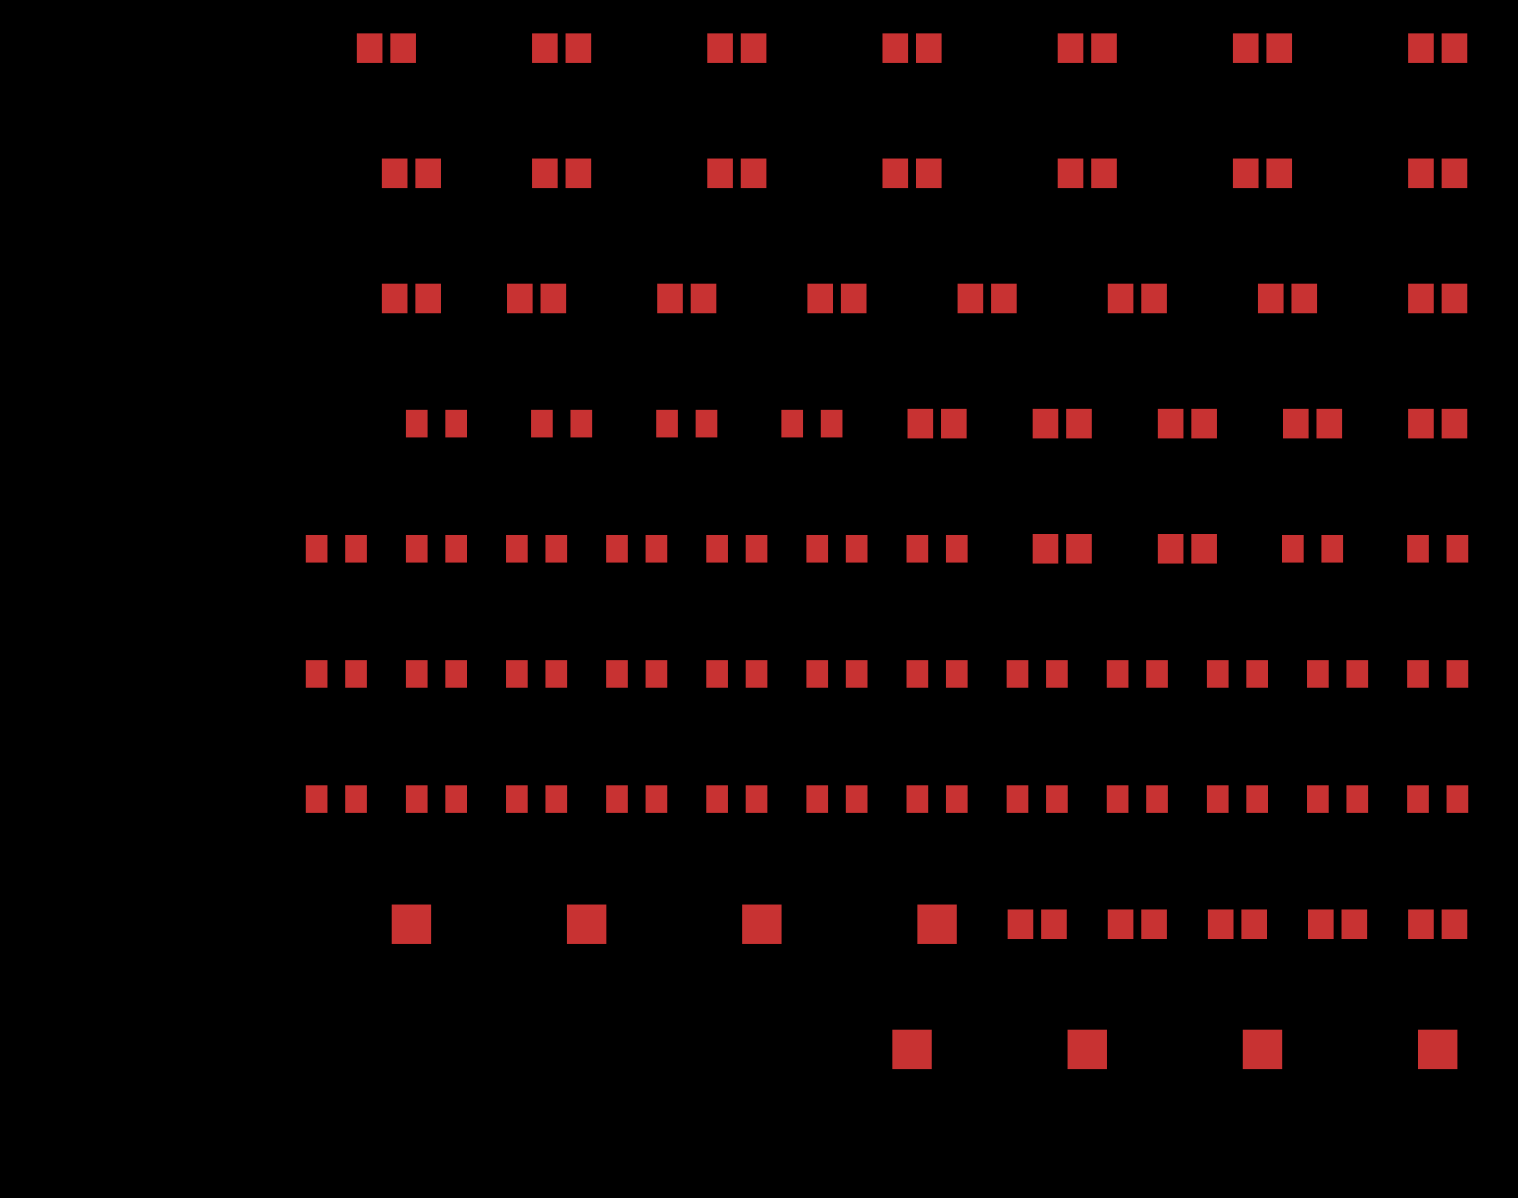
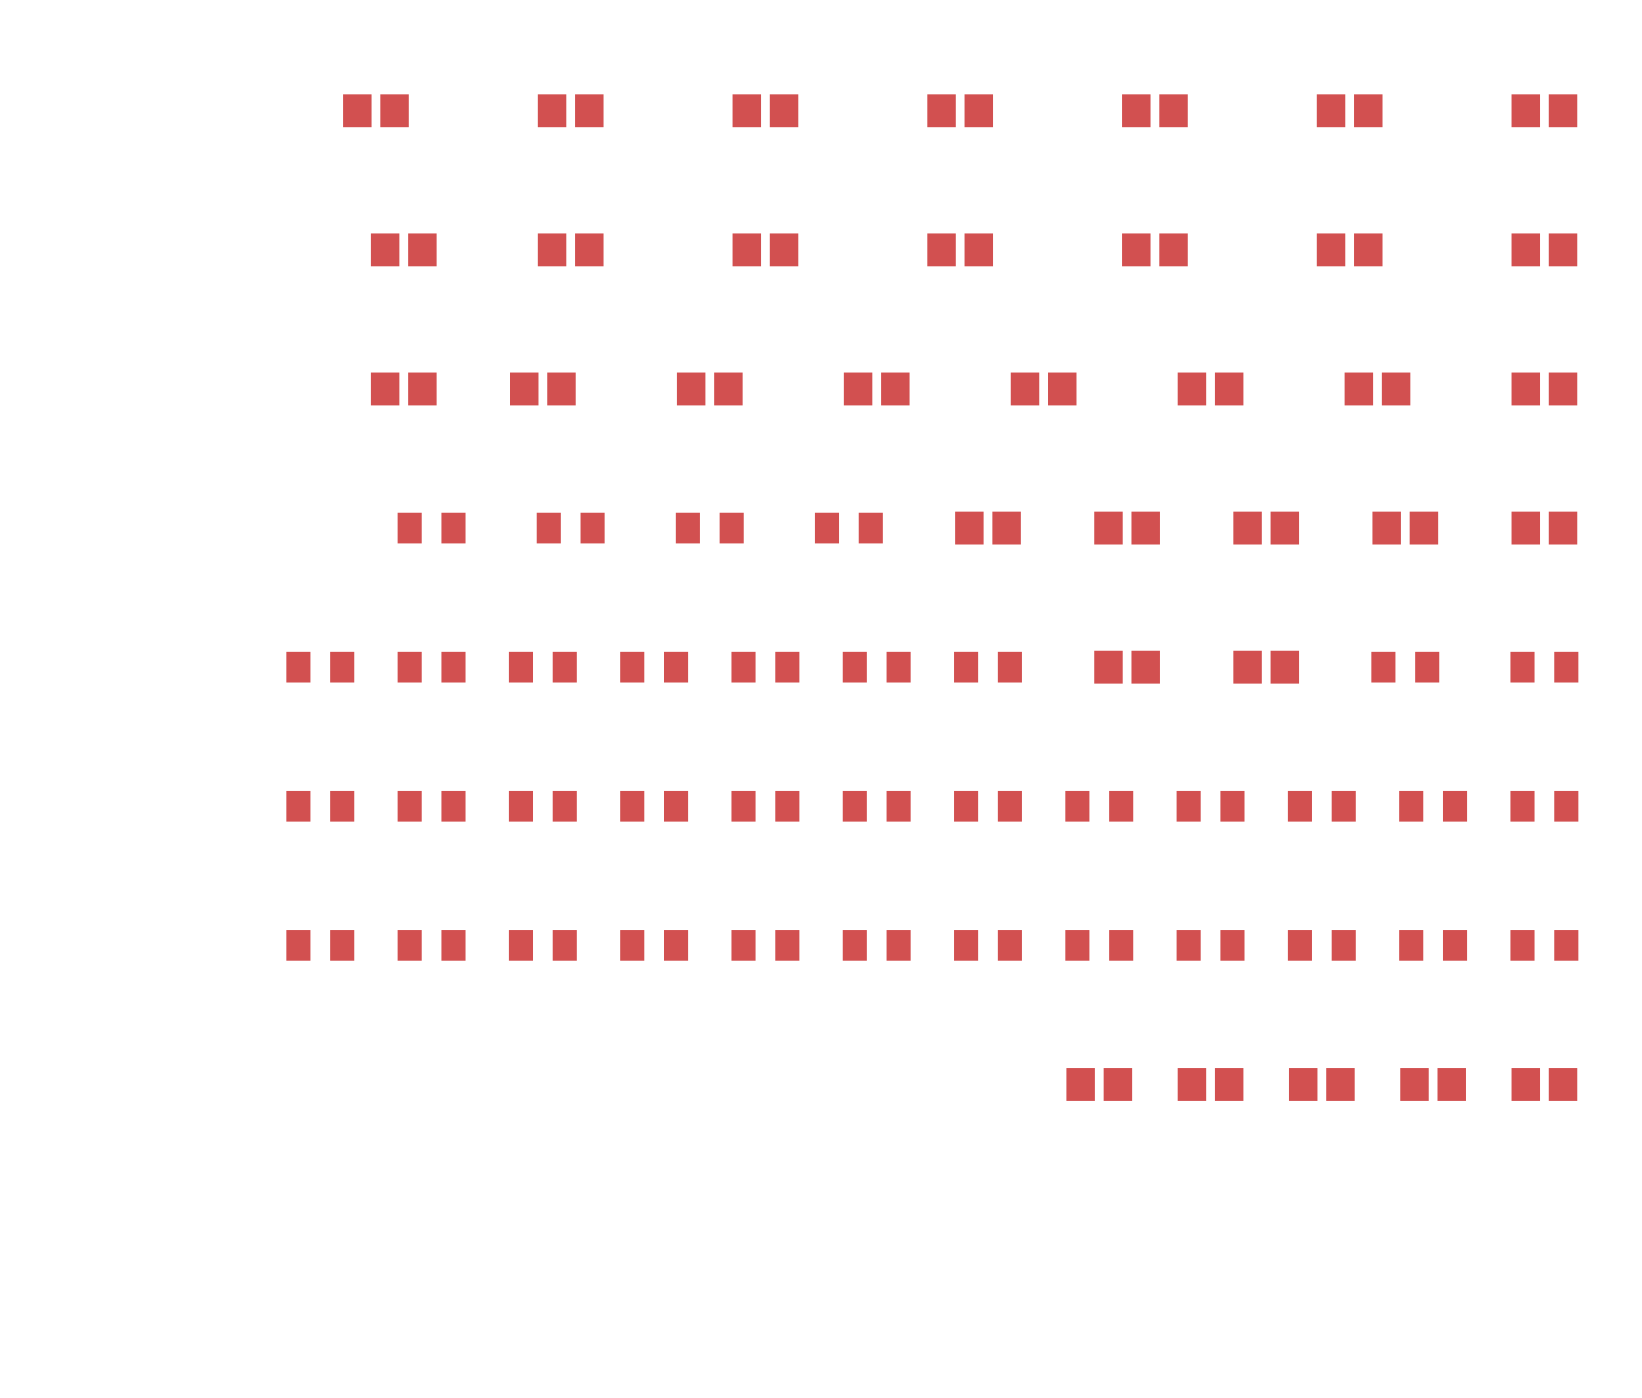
part: (411, 924) -> none
part: (586, 924) -> none
part: (761, 924) -> none
part: (937, 924) -> none
part: (912, 1049) -> none
part: (1087, 1049) -> none
part: (1262, 1049) -> none
part: (1437, 1049) -> none

